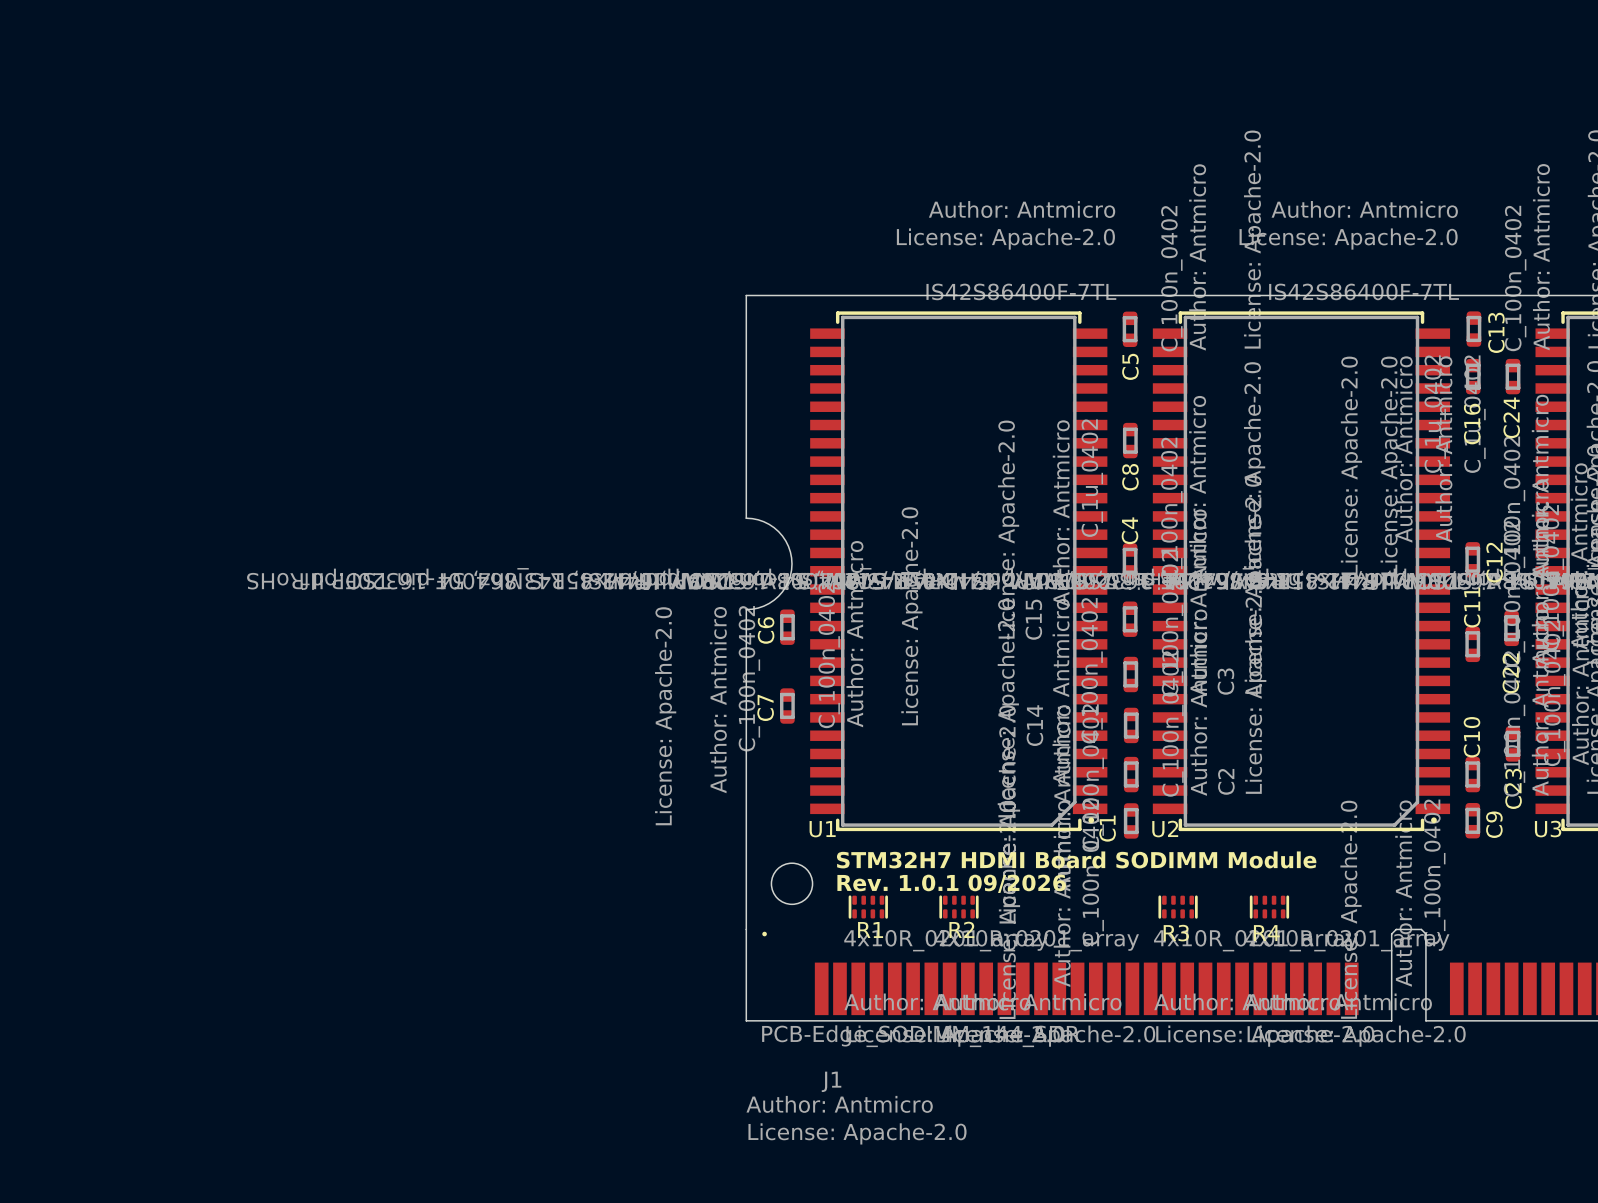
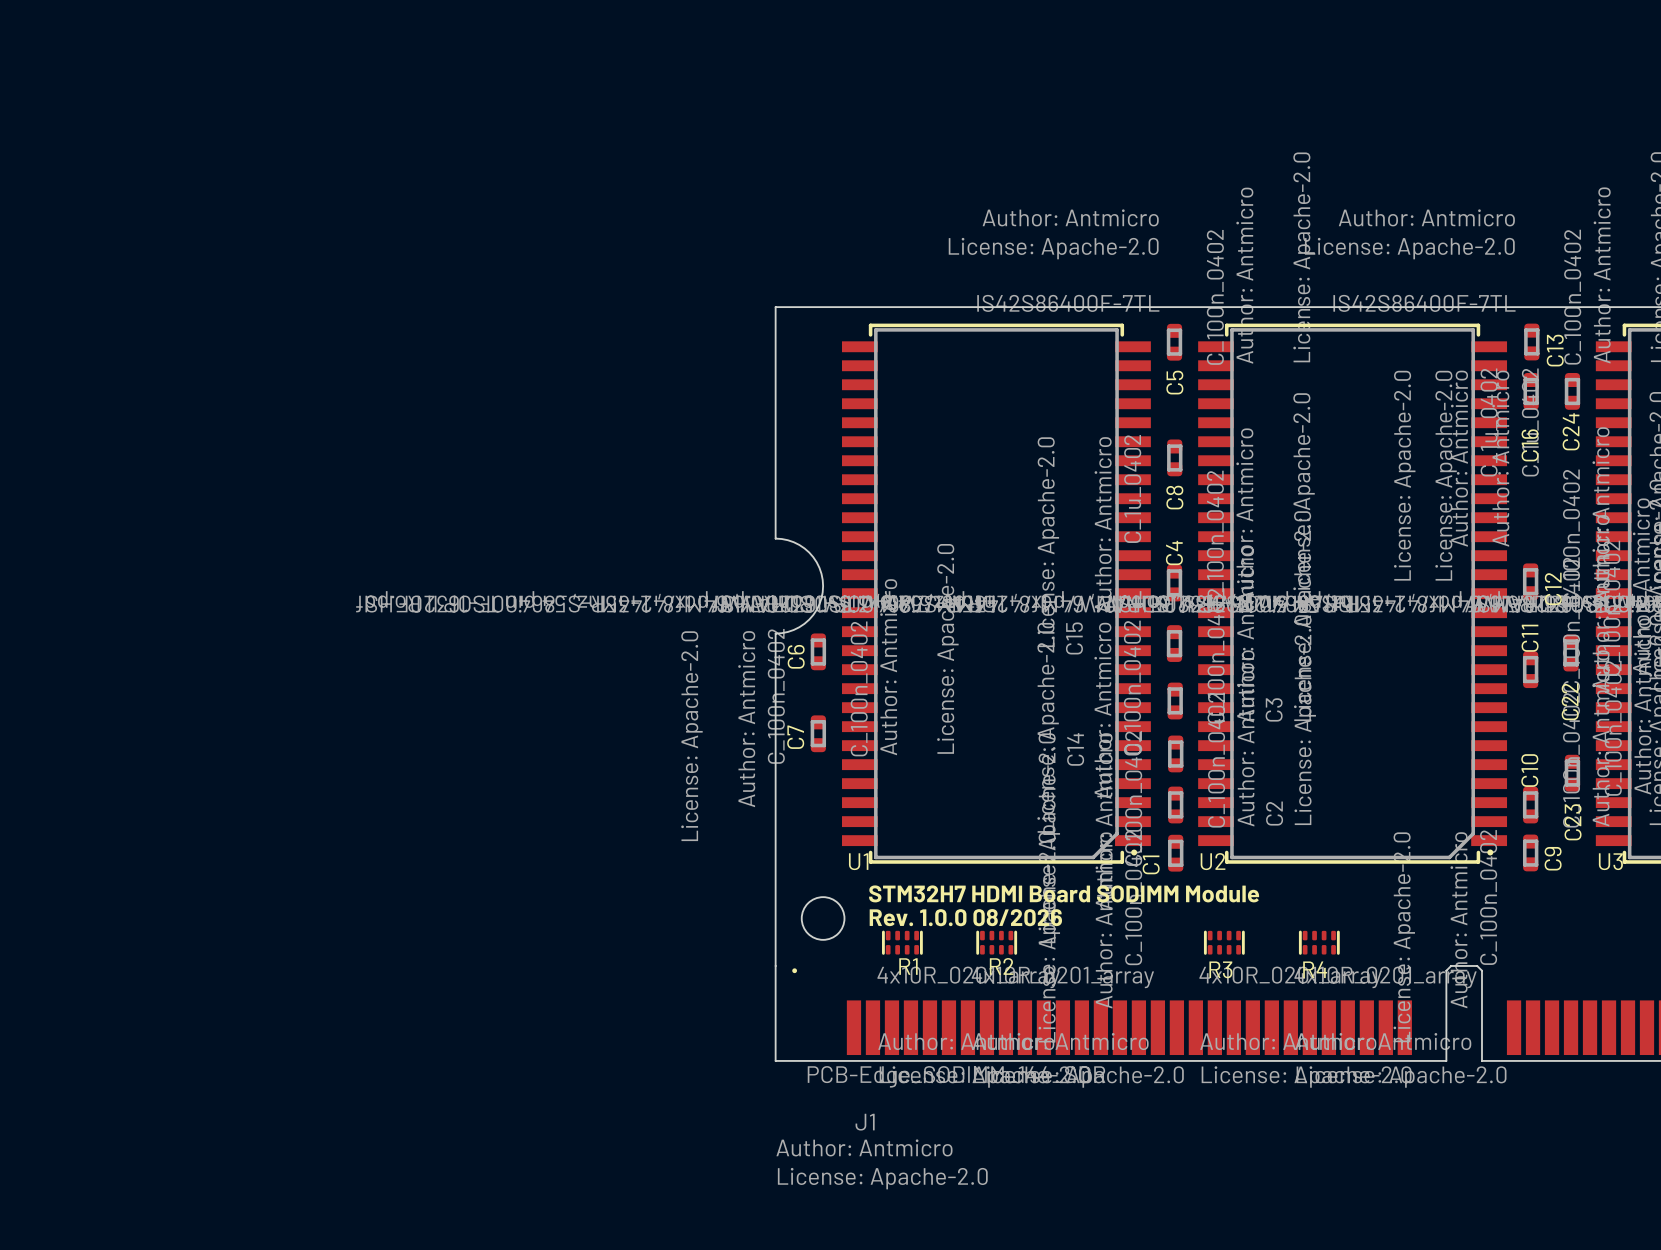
text: Rev. 1.0.1 09/2026 (951, 883) -> Rev. 1.0.0 08/2026 (965, 917)

